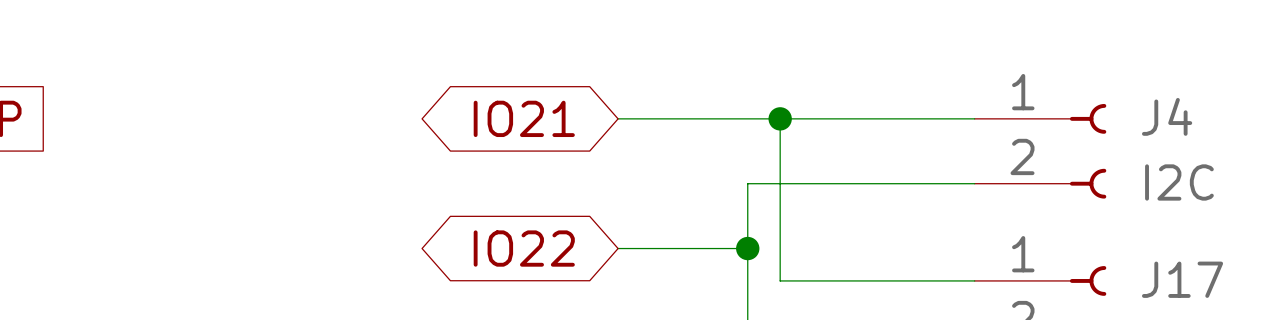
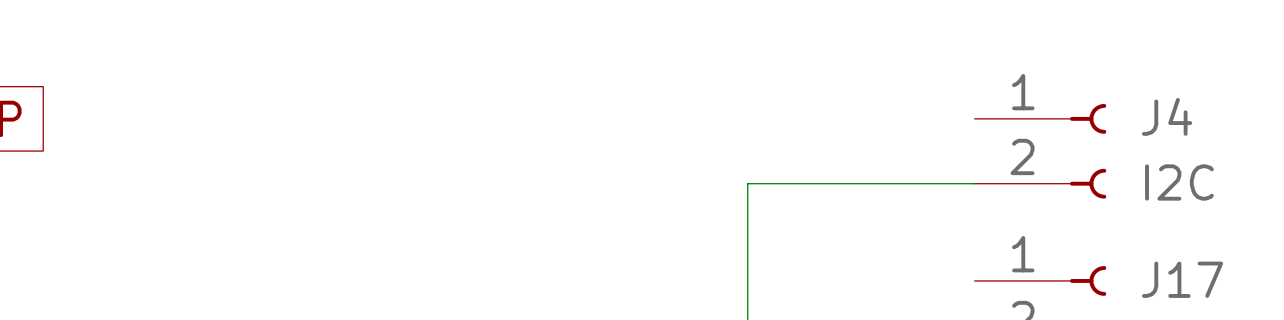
global label: IO21 (524, 118) -> none
wire: (618, 118) (974, 118) -> none
wire: (780, 118) (780, 280) (974, 280) -> none
junction: (780, 118) -> none
global label: IO22 (524, 248) -> none
wire: (618, 248) (747, 248) -> none
junction: (747, 248) -> none

